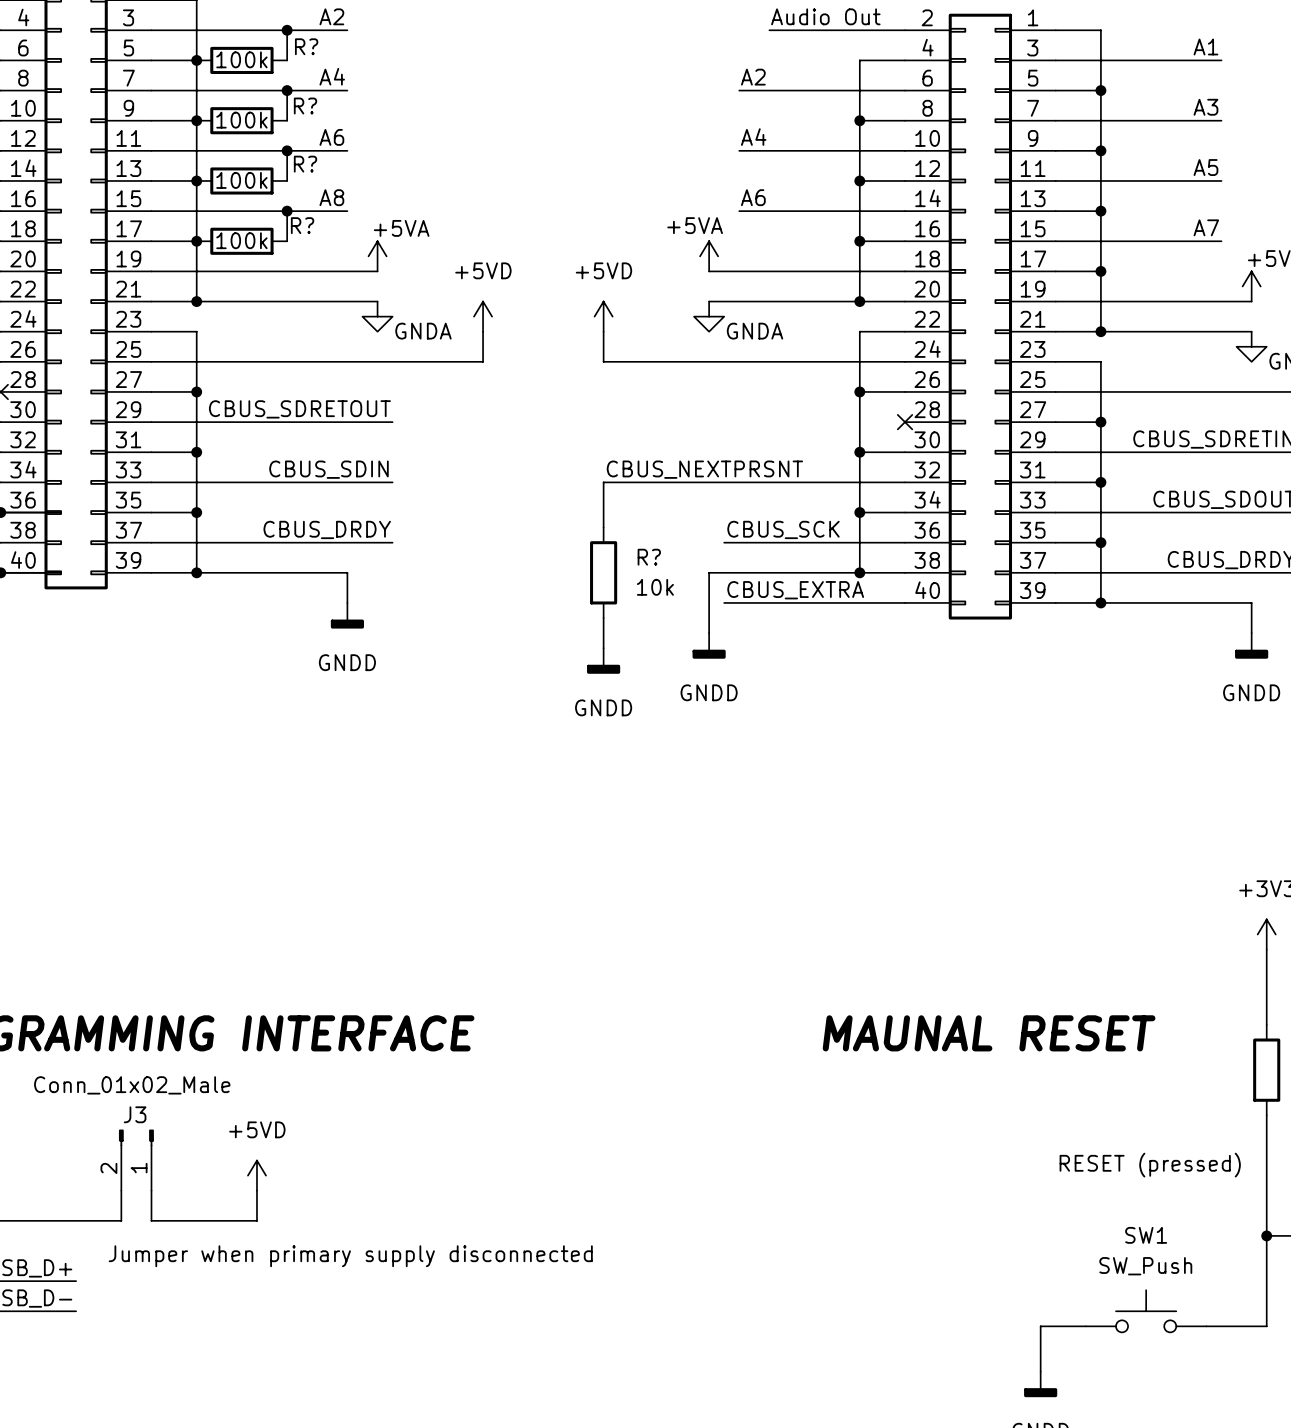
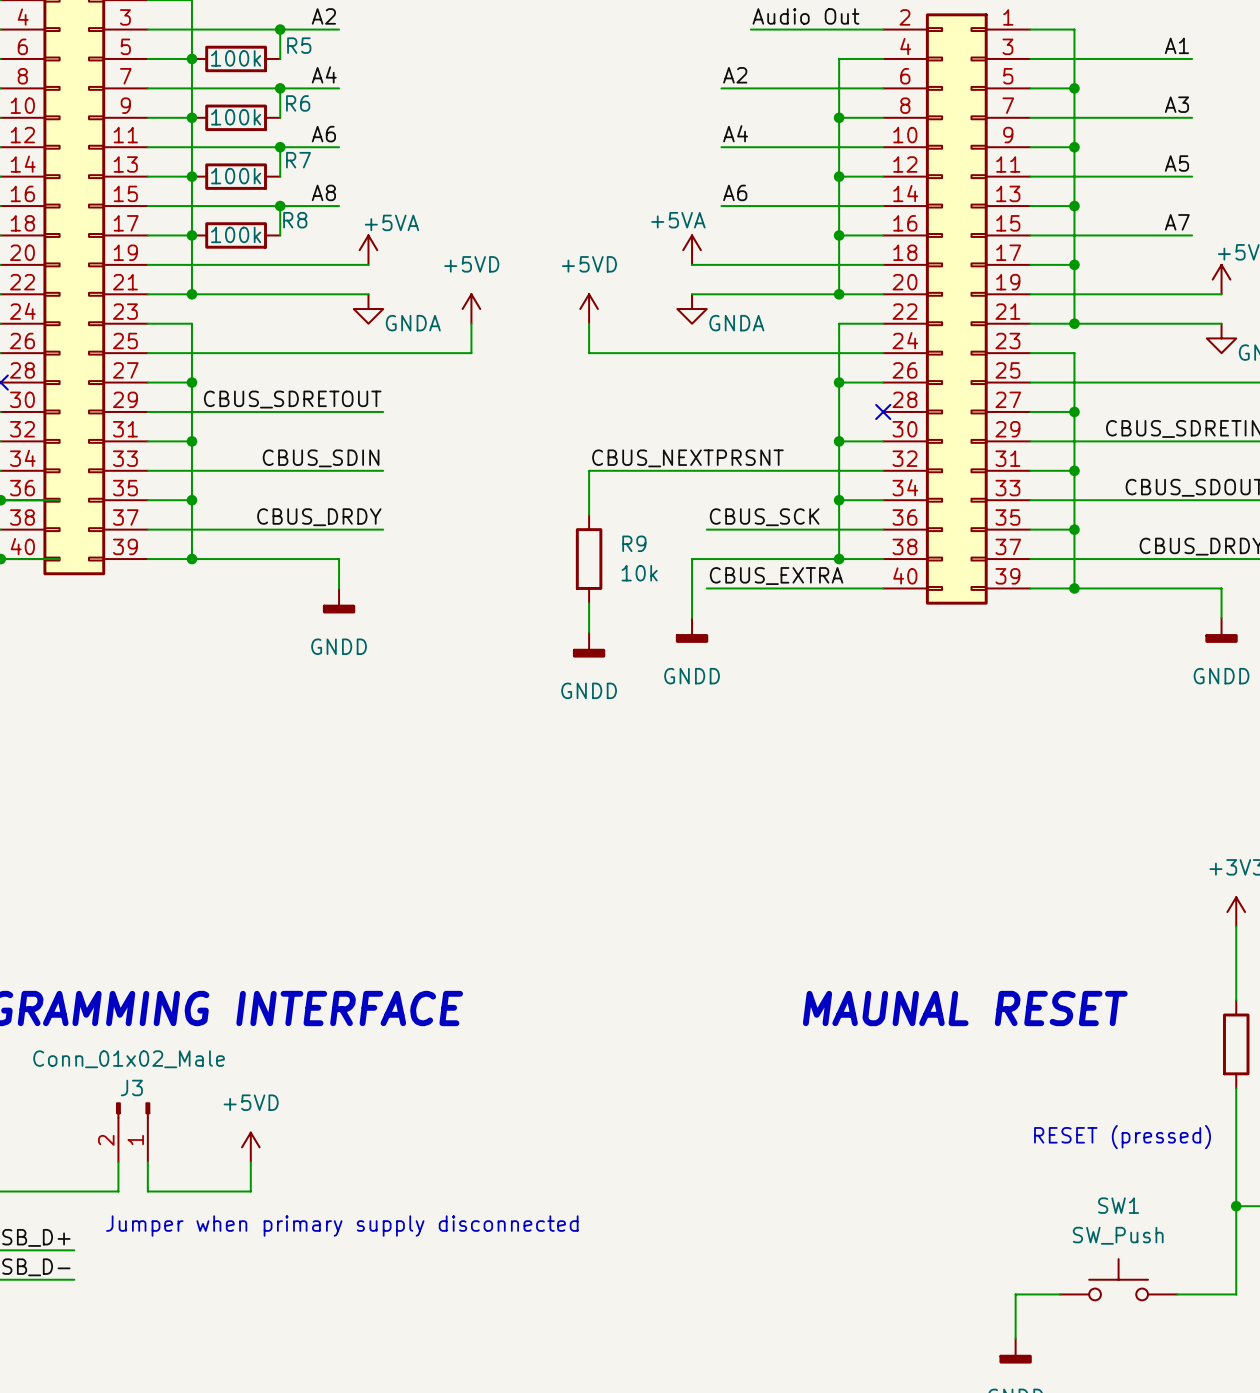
R? name: R? (306, 46) -> R5 (299, 45)
R? name: R? (305, 105) -> R6 (298, 103)
R? name: R? (305, 164) -> R7 (298, 160)
R? name: R? (302, 225) -> R8 (295, 220)
R? name: R? (649, 557) -> R9 (634, 543)

